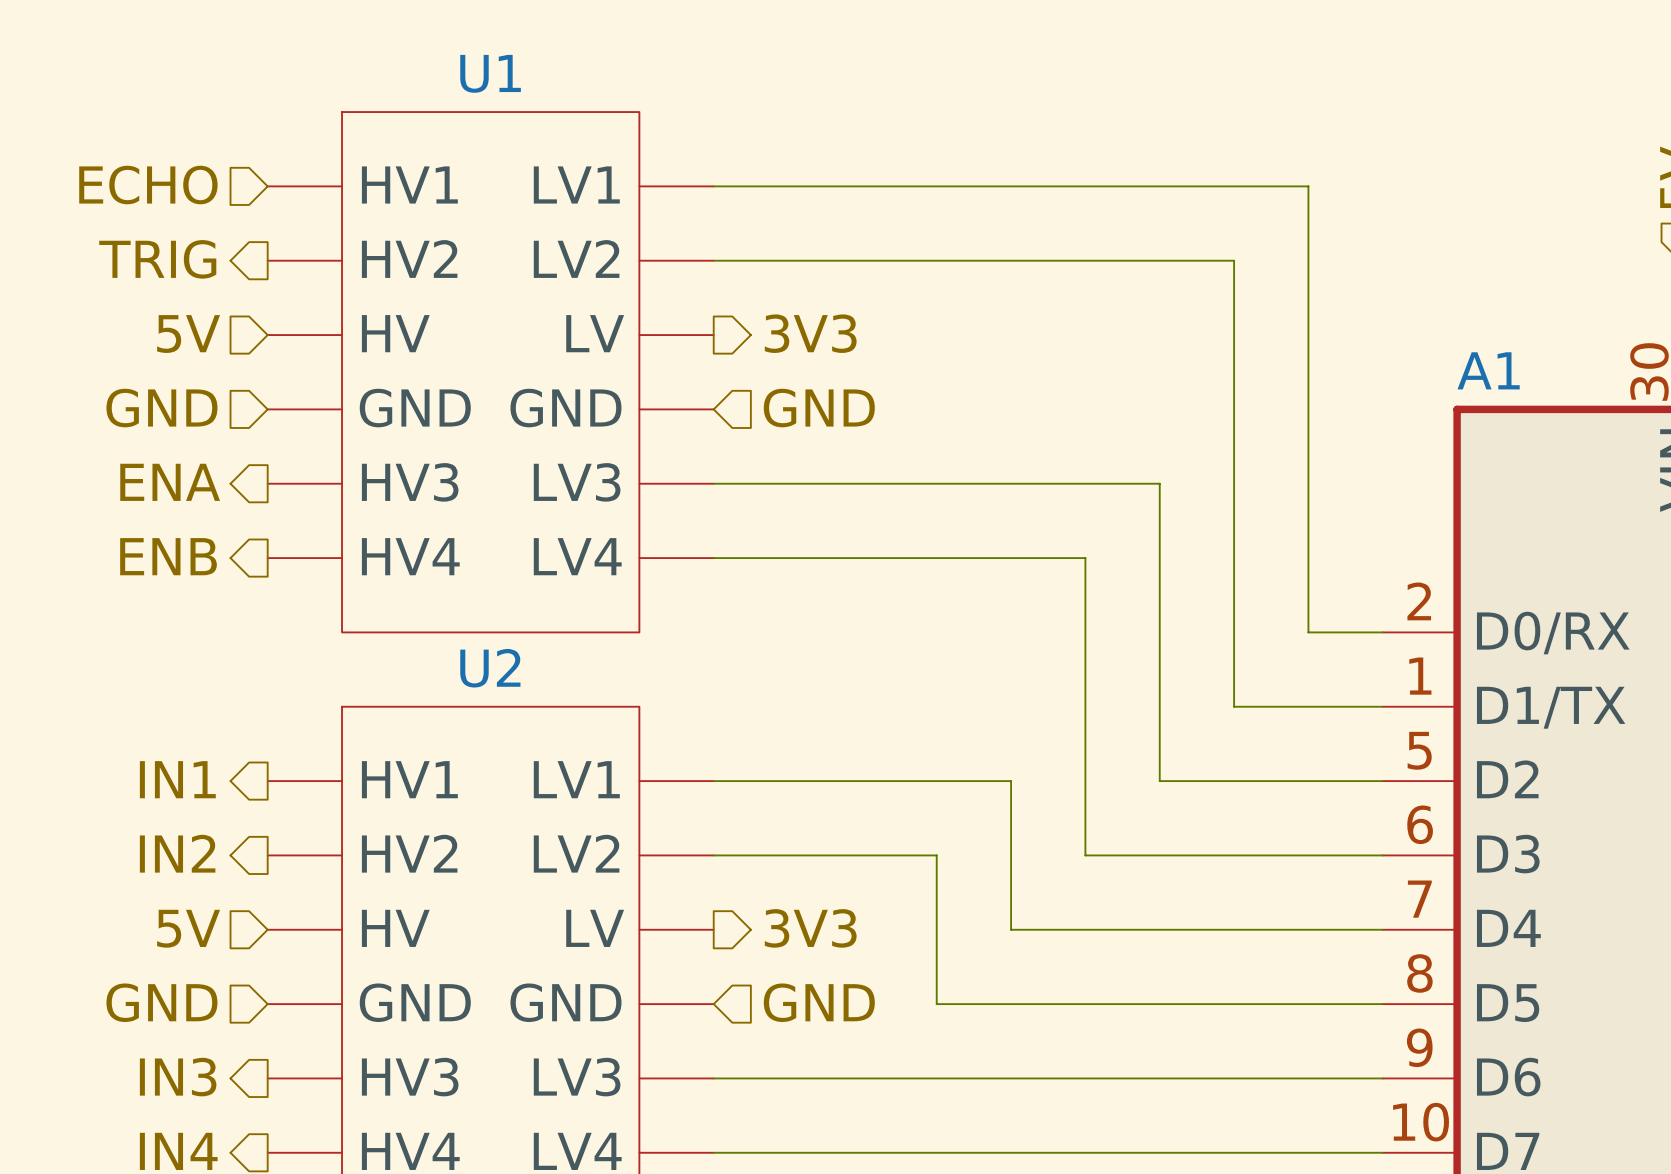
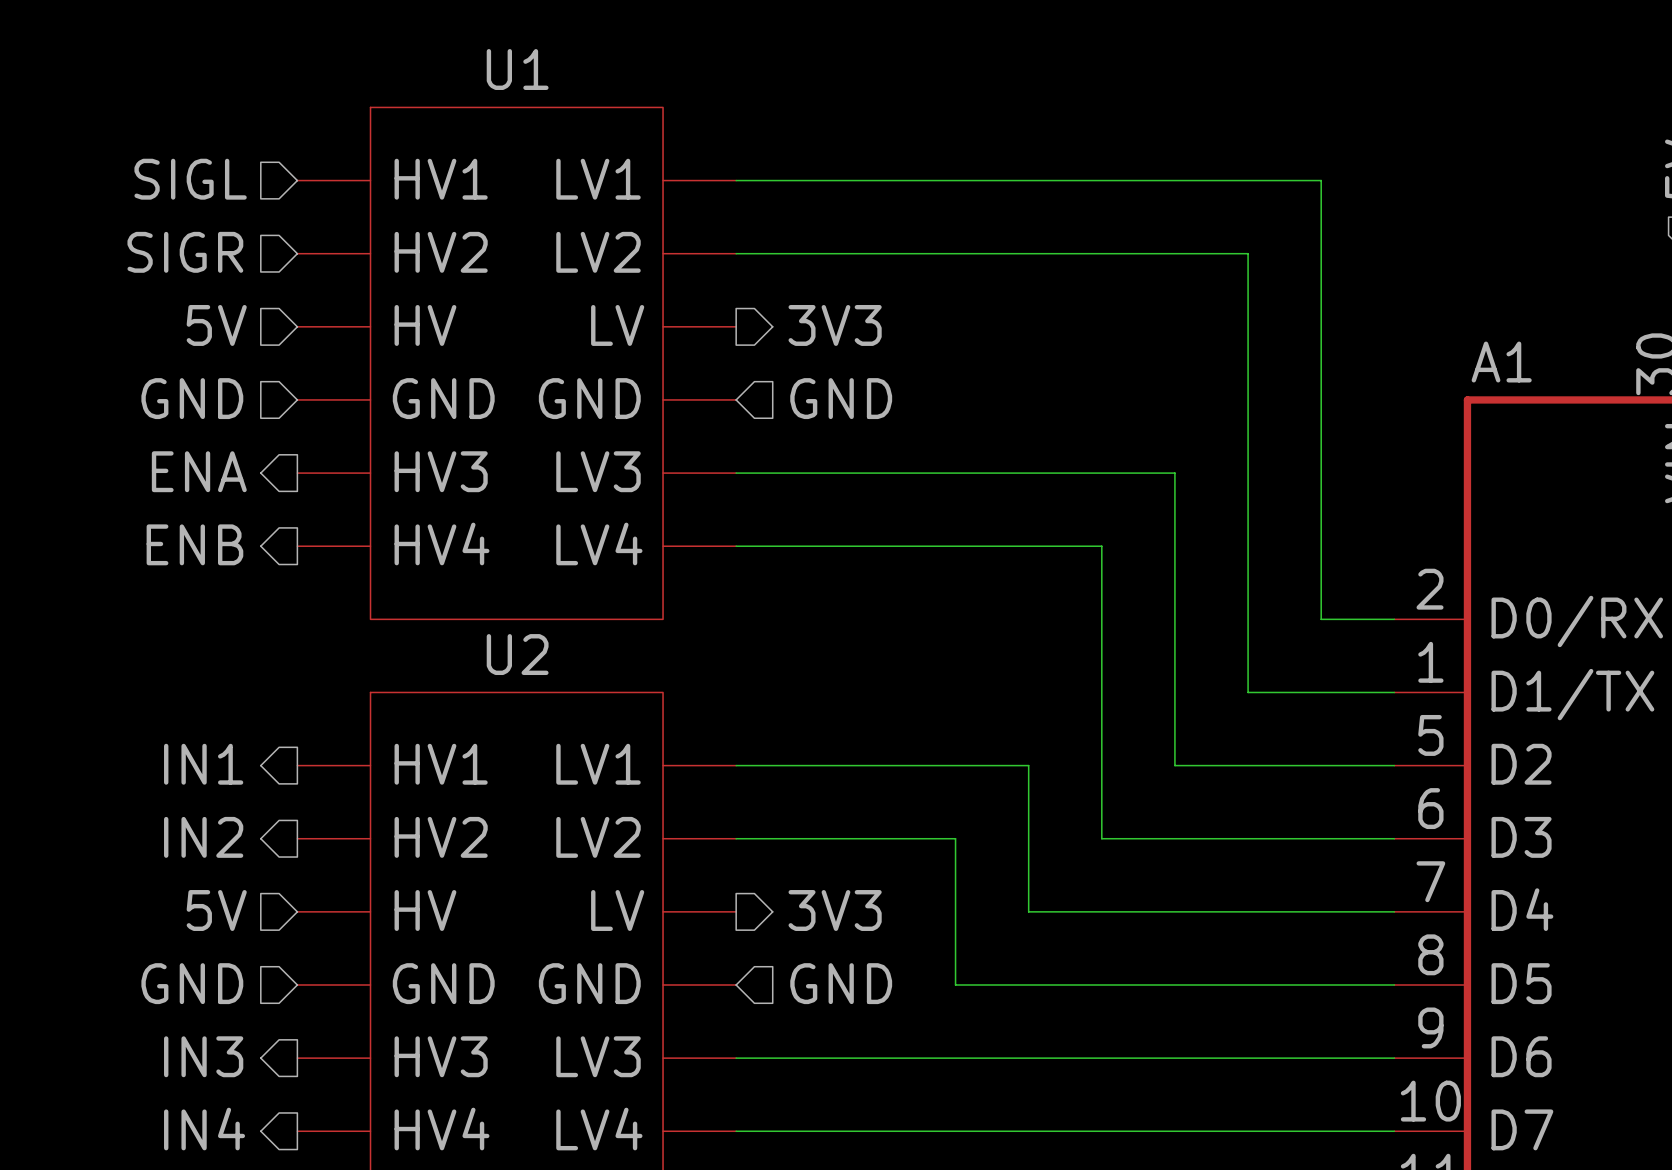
hierarchical label: ECHO (148, 185) -> SIGL (190, 179)
hierarchical label shape: output (157, 259) -> input (185, 252)
hierarchical label: TRIG (157, 259) -> SIGR (185, 252)

